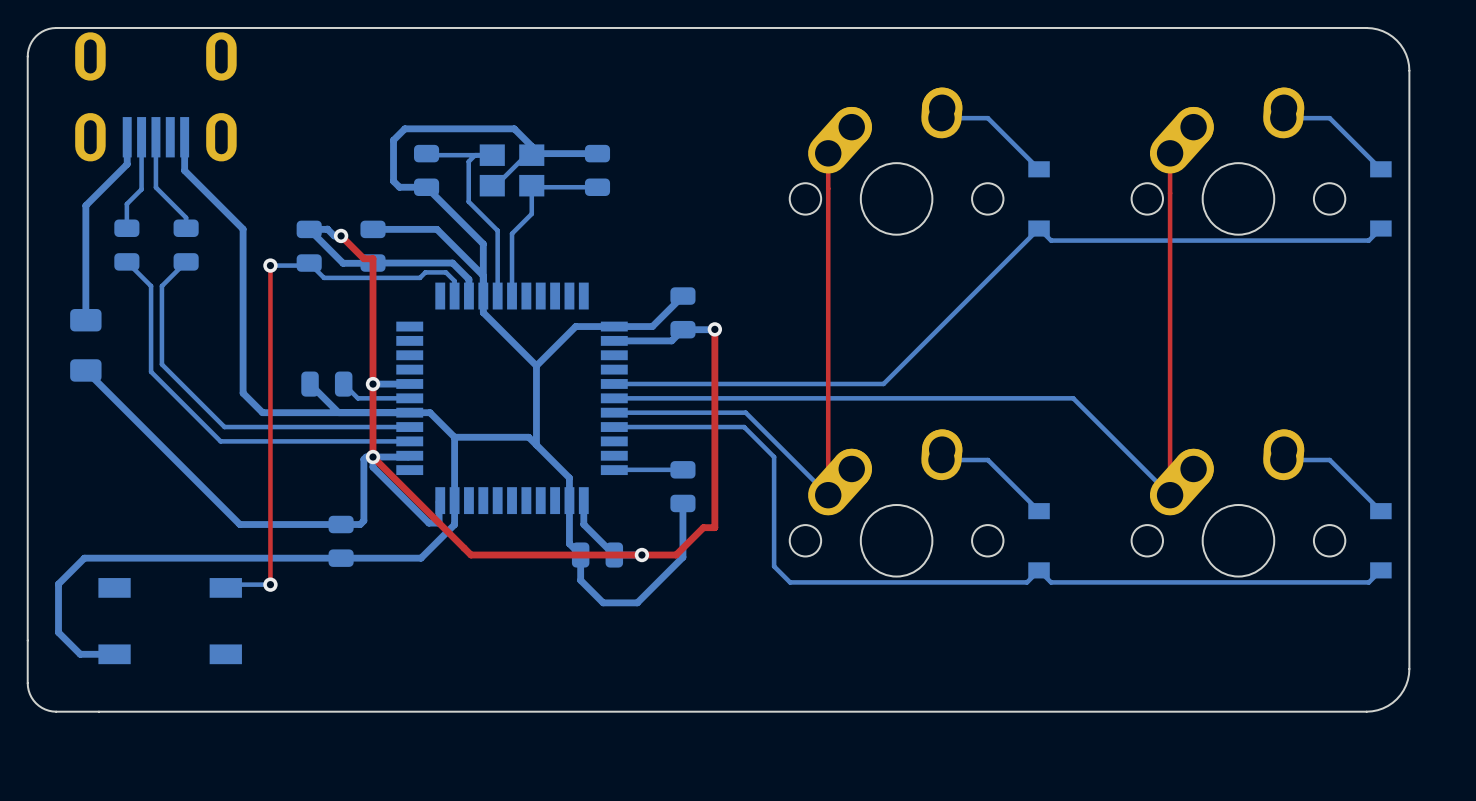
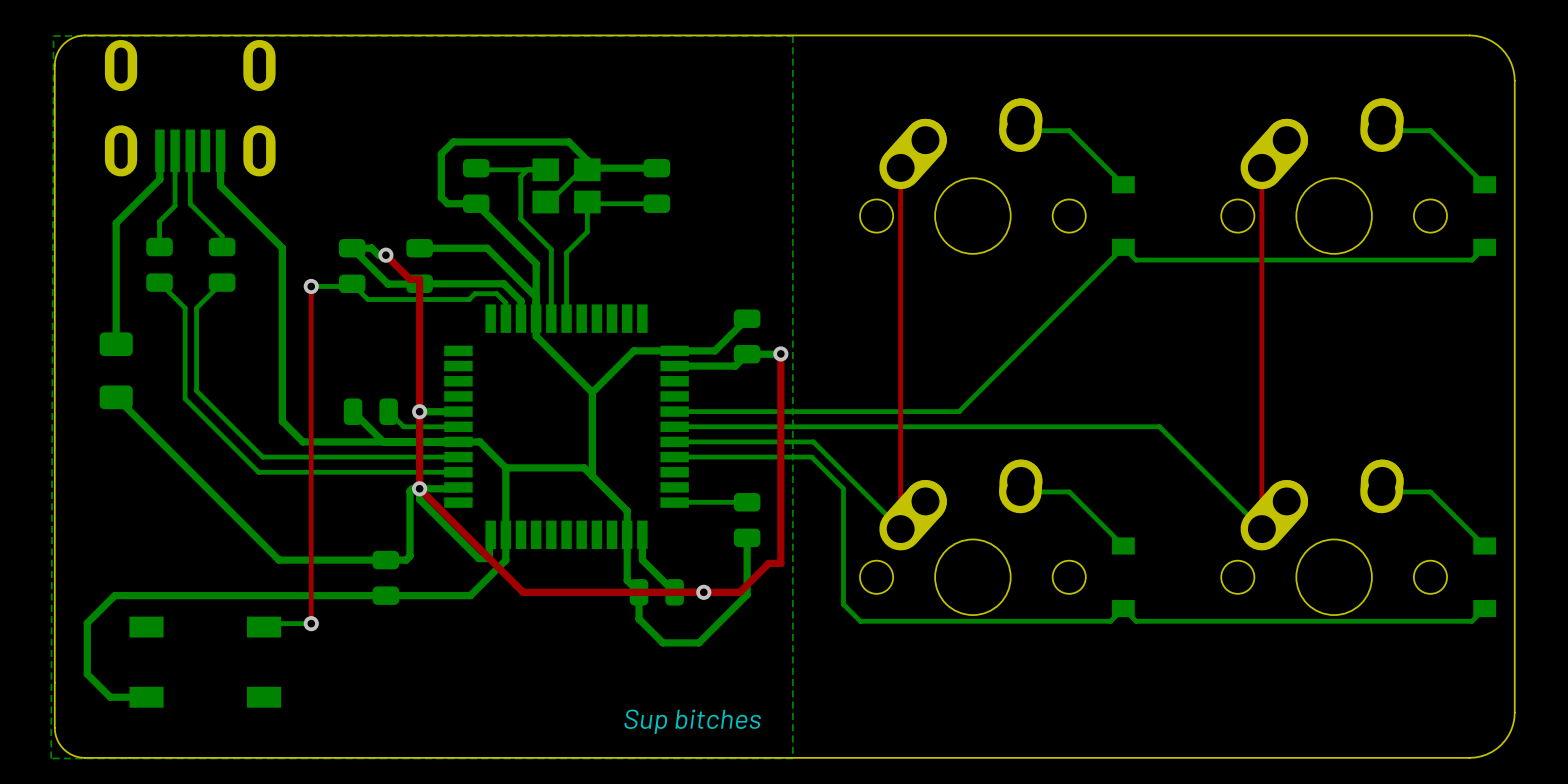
bottom zone outline: none -> (53, 36) (51, 758) (792, 758) (792, 36) (53, 36)
text: none -> Sup bitches (692, 721)

